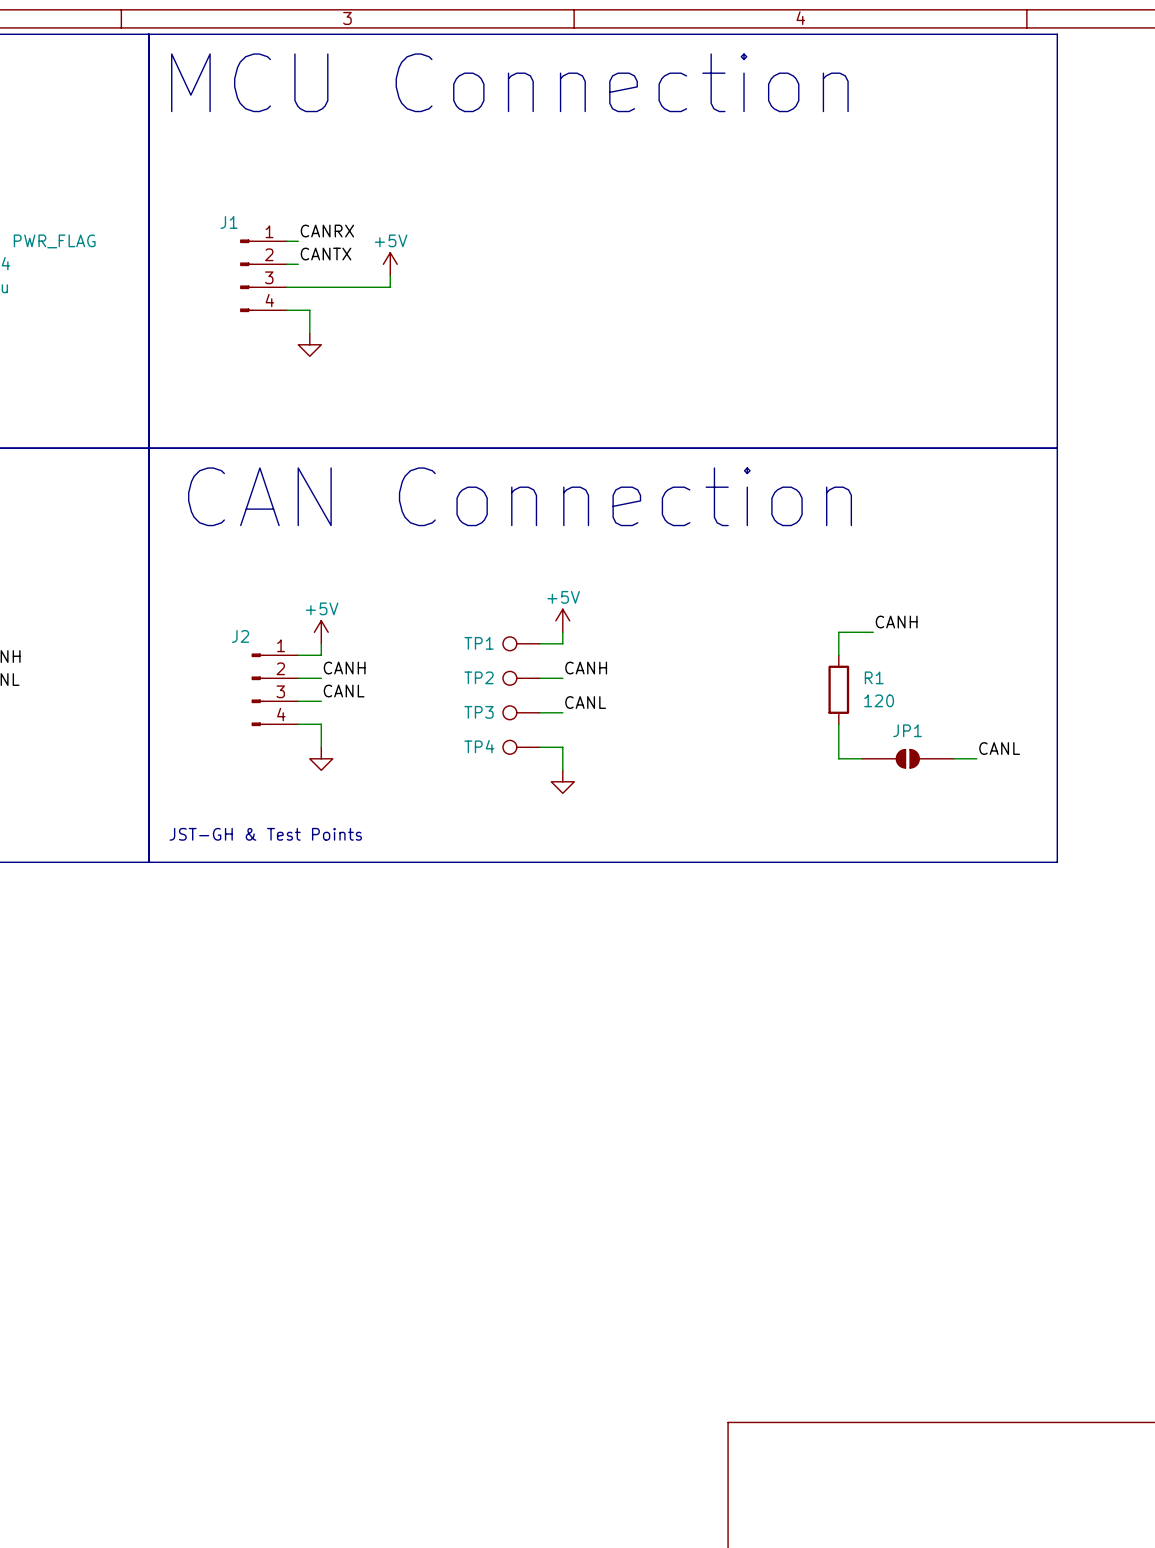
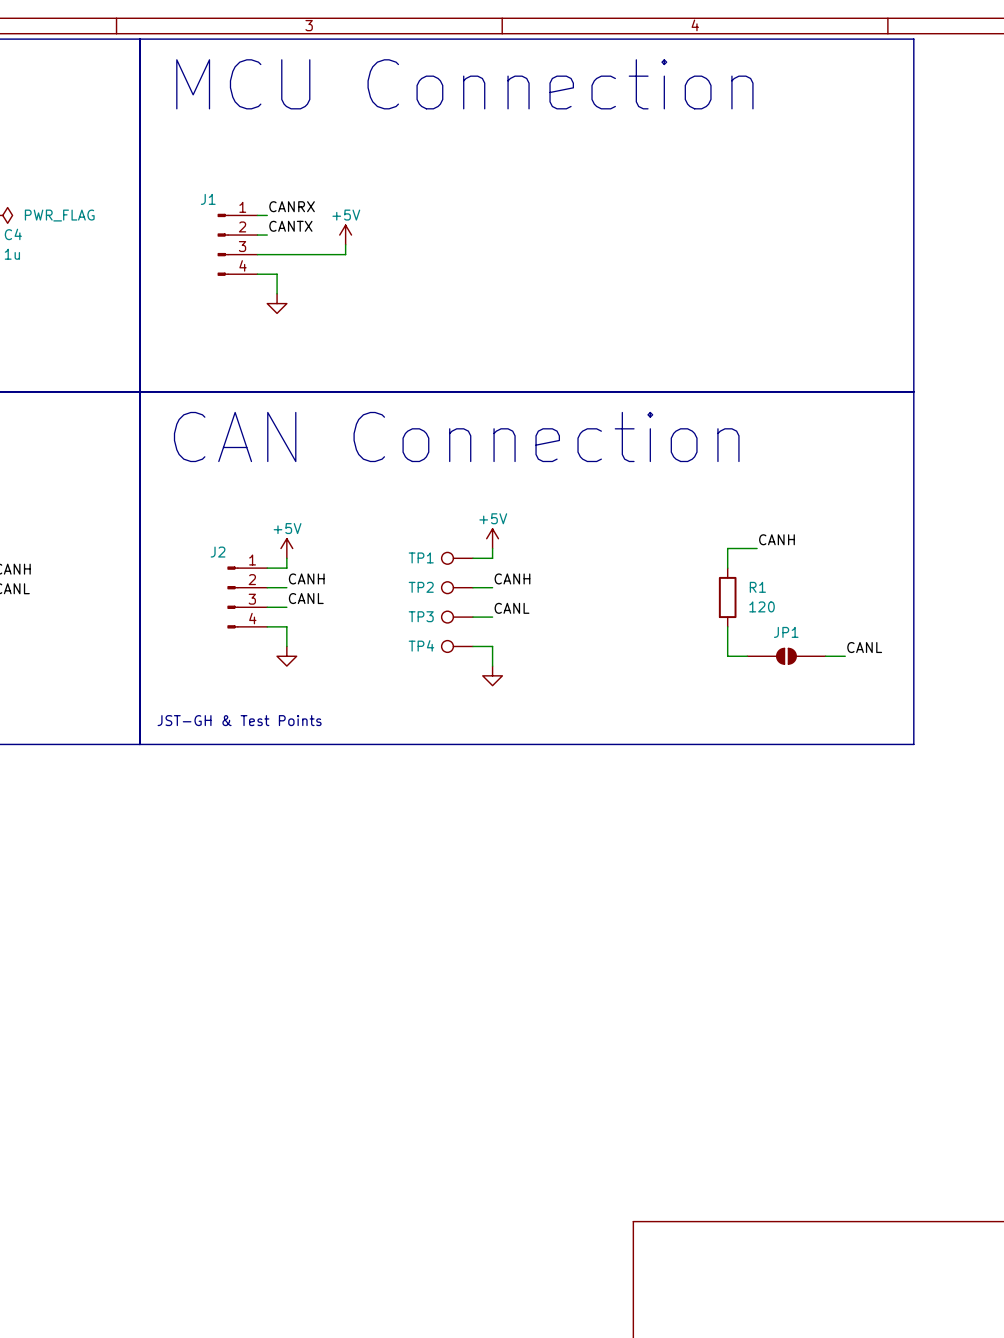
text: MCU Connection (509, 82) -> none
text: none -> MCU Connection (464, 84)
text: CAN Connection (520, 496) -> none
text: none -> CAN Connection (456, 436)

